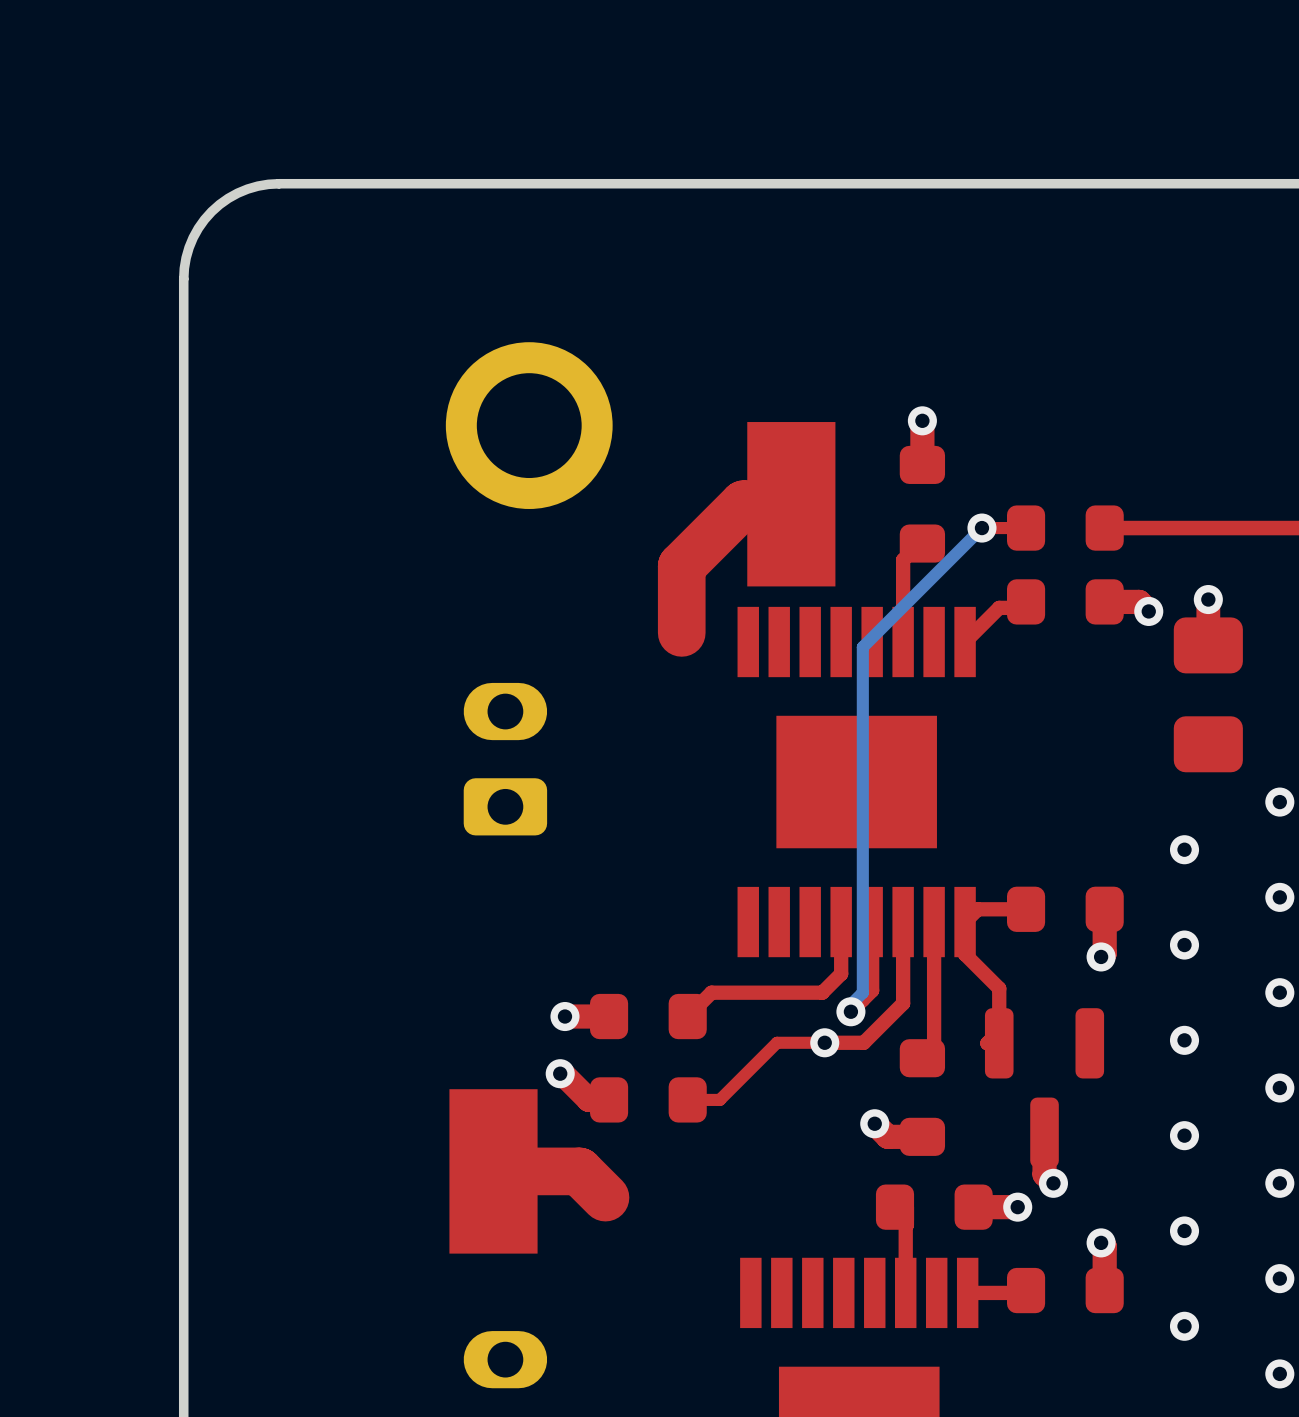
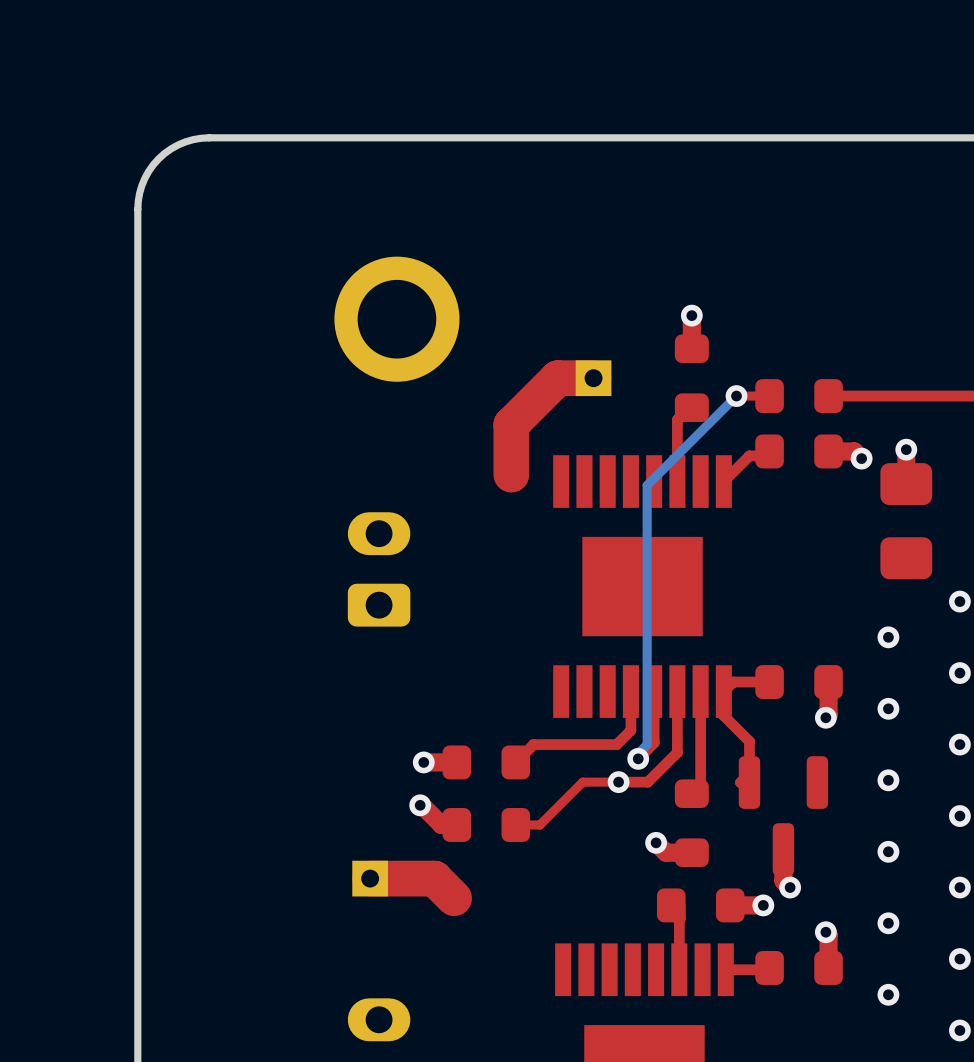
part footprint: [747, 422, 836, 587] -> [575, 360, 612, 397]
part footprint: [449, 1089, 538, 1254] -> [352, 860, 389, 897]

